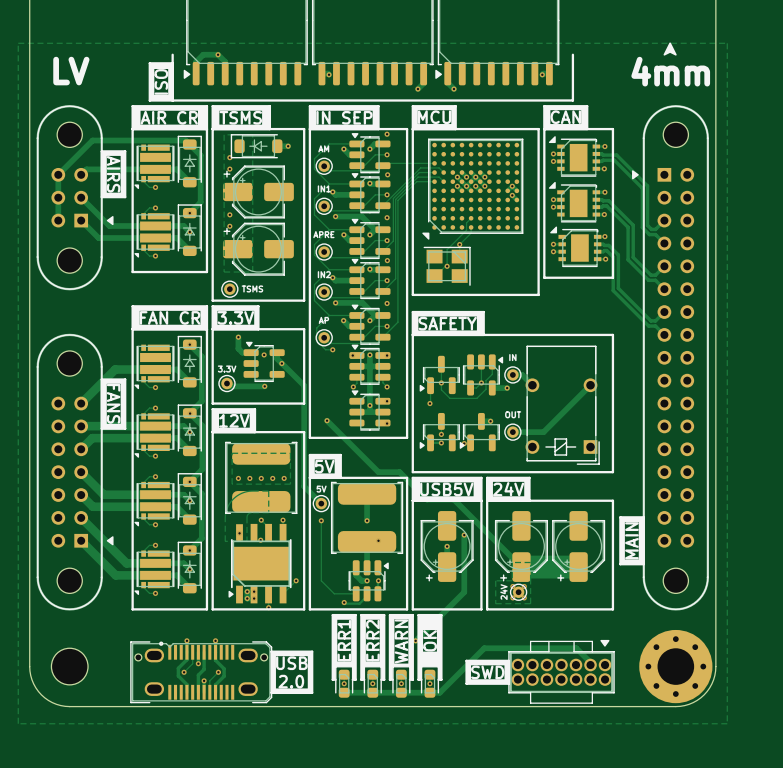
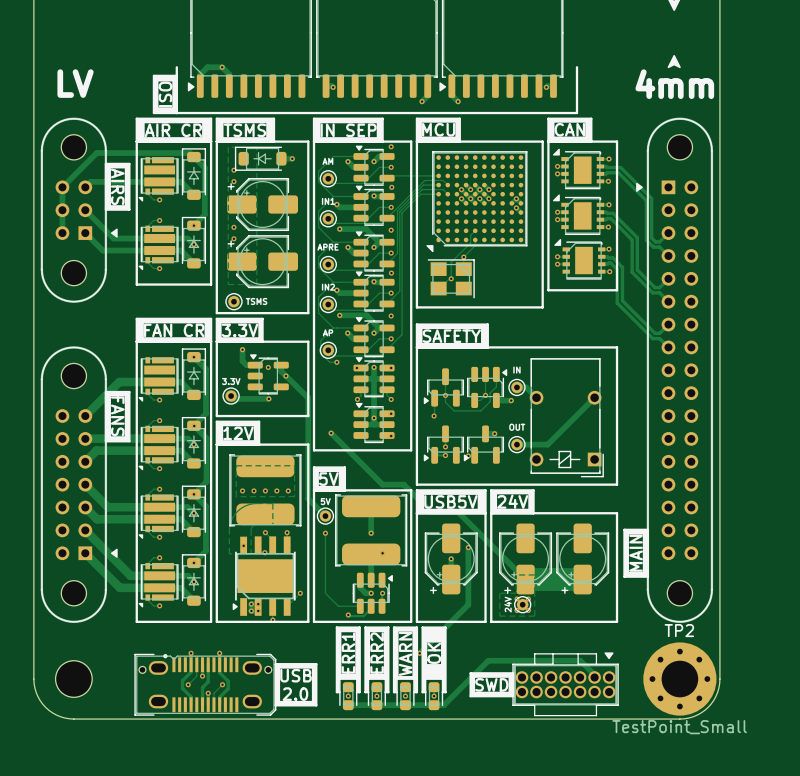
zone outline: (18, 43) (727, 43) (727, 723) (18, 723) (18, 43) -> none
TP2 name: none -> TP2 (679, 630)
TP2 value: none -> TestPoint_Small (679, 727)

